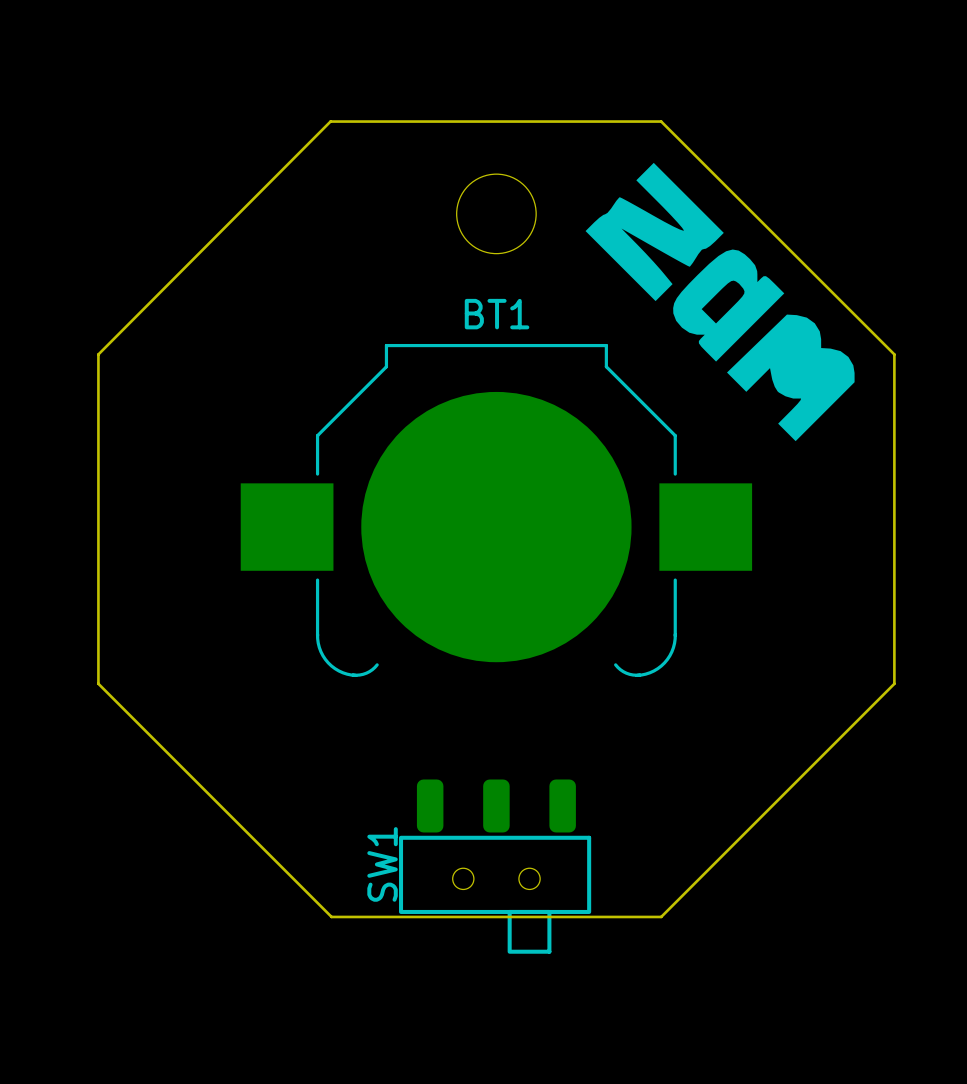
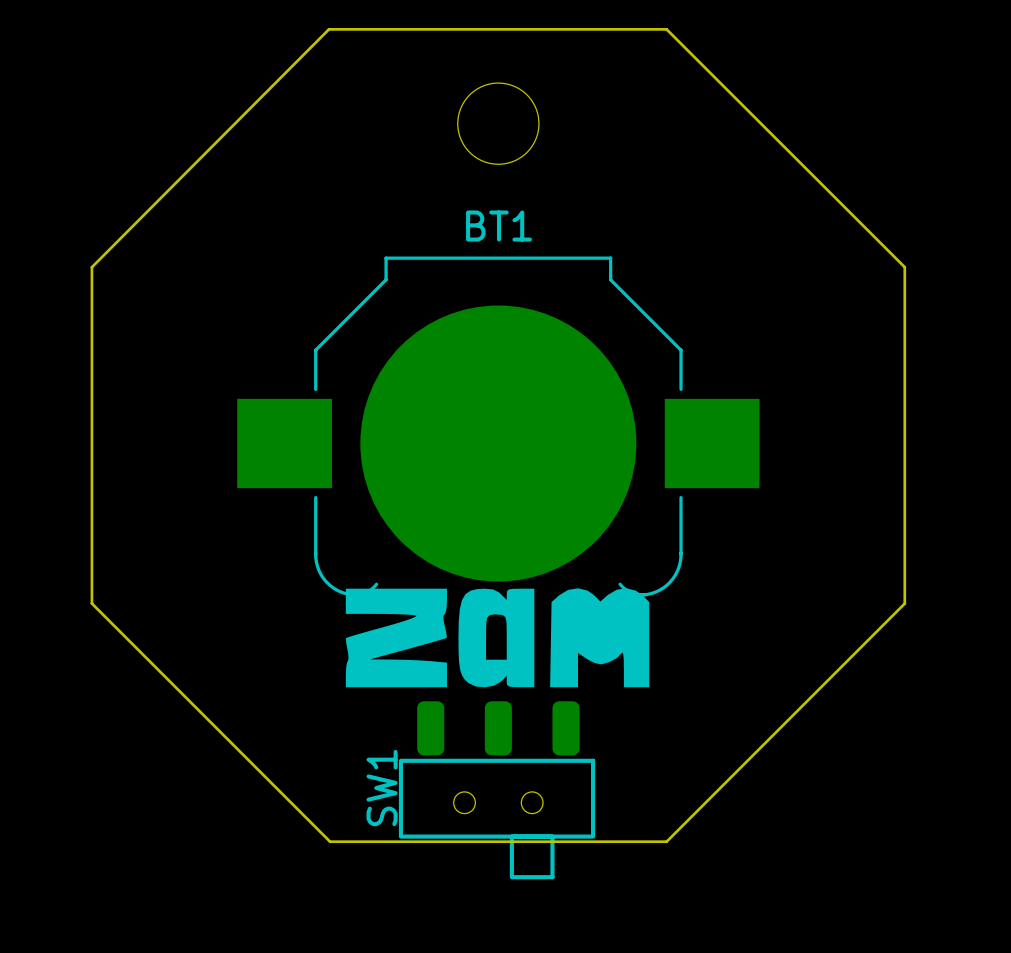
drawing: [585, 162, 855, 442] -> none
drawing: none -> [345, 588, 650, 688]

